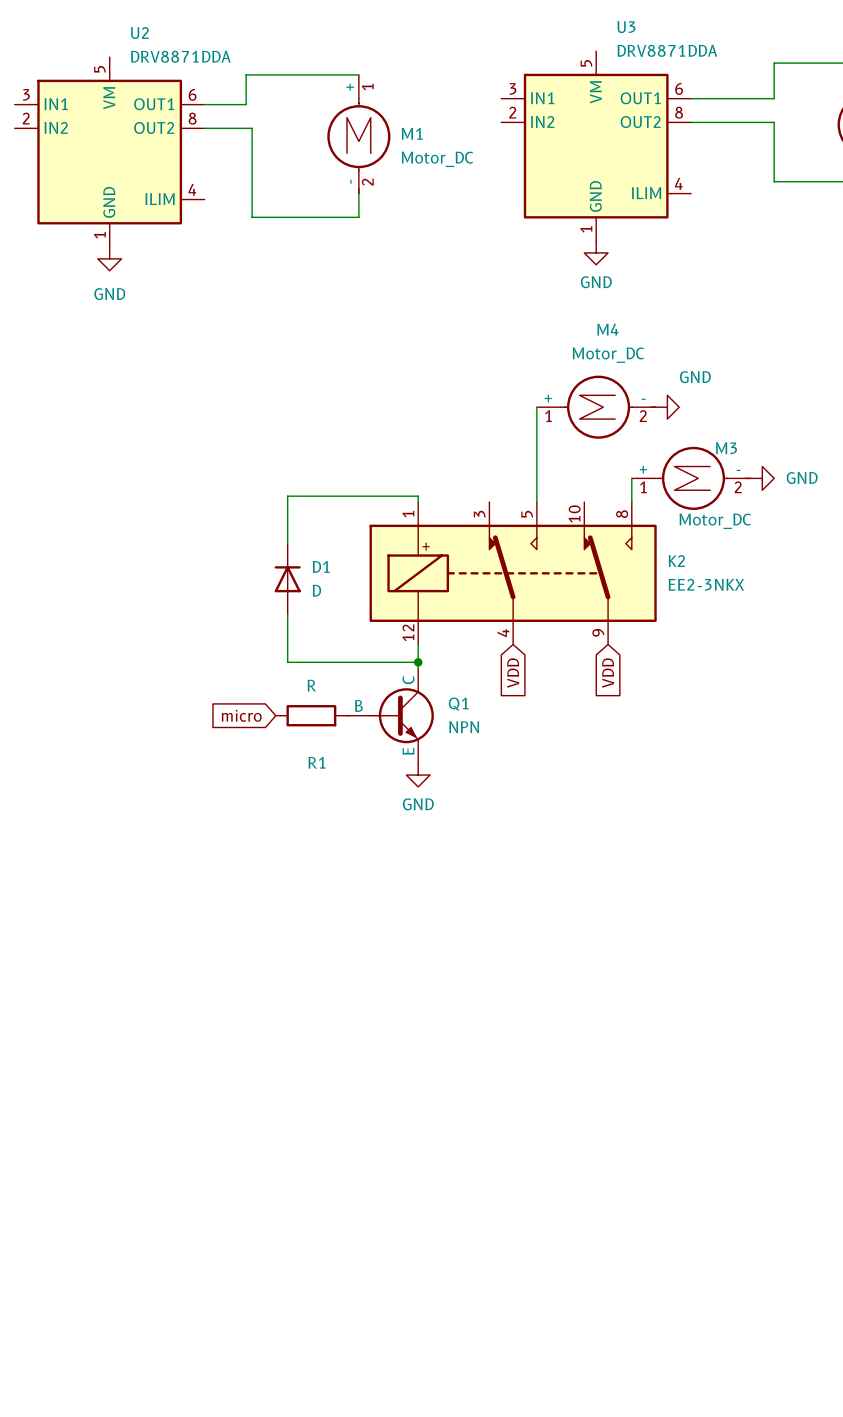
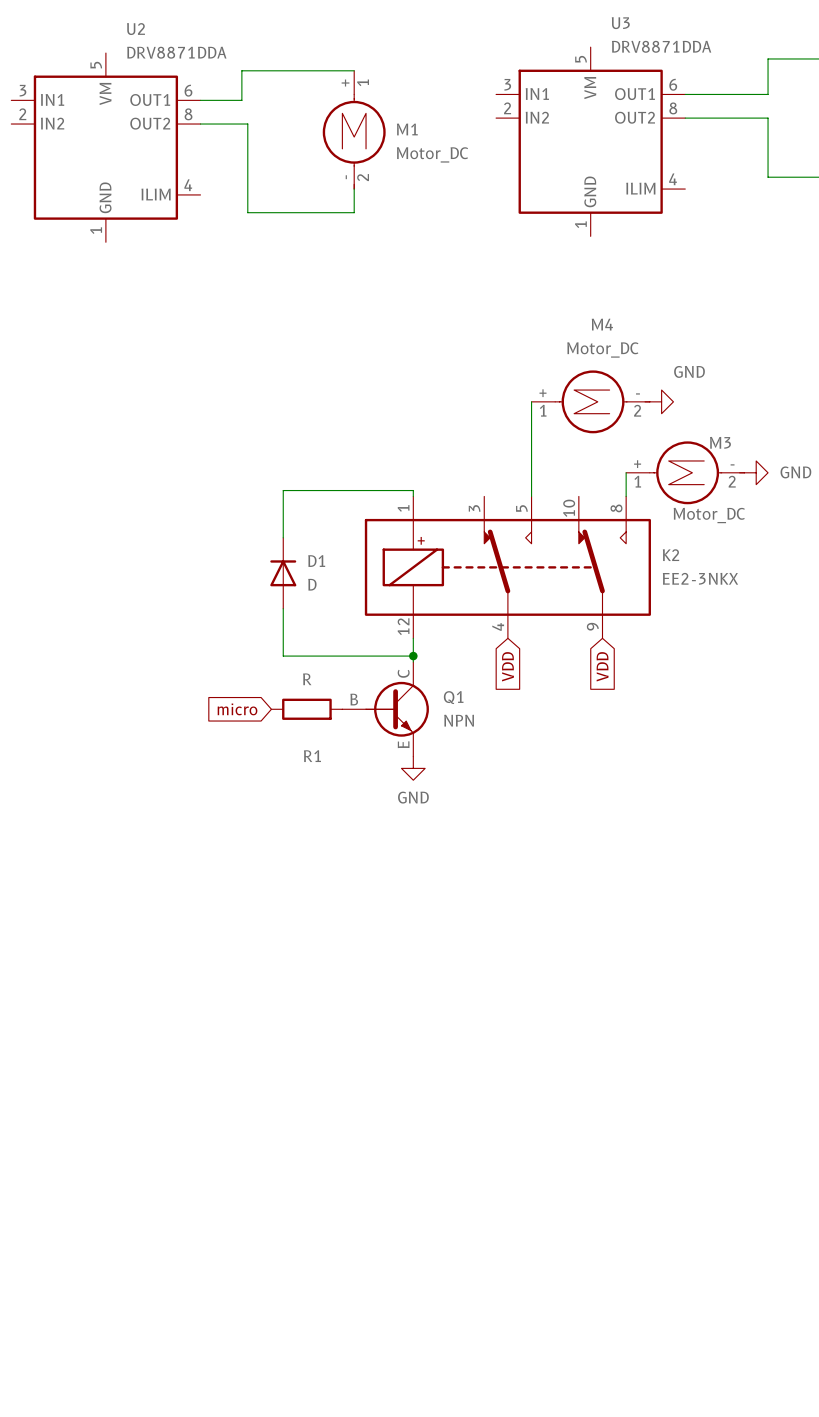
power symbol: GND (596, 252) -> none
power symbol: GND (109, 258) -> none

